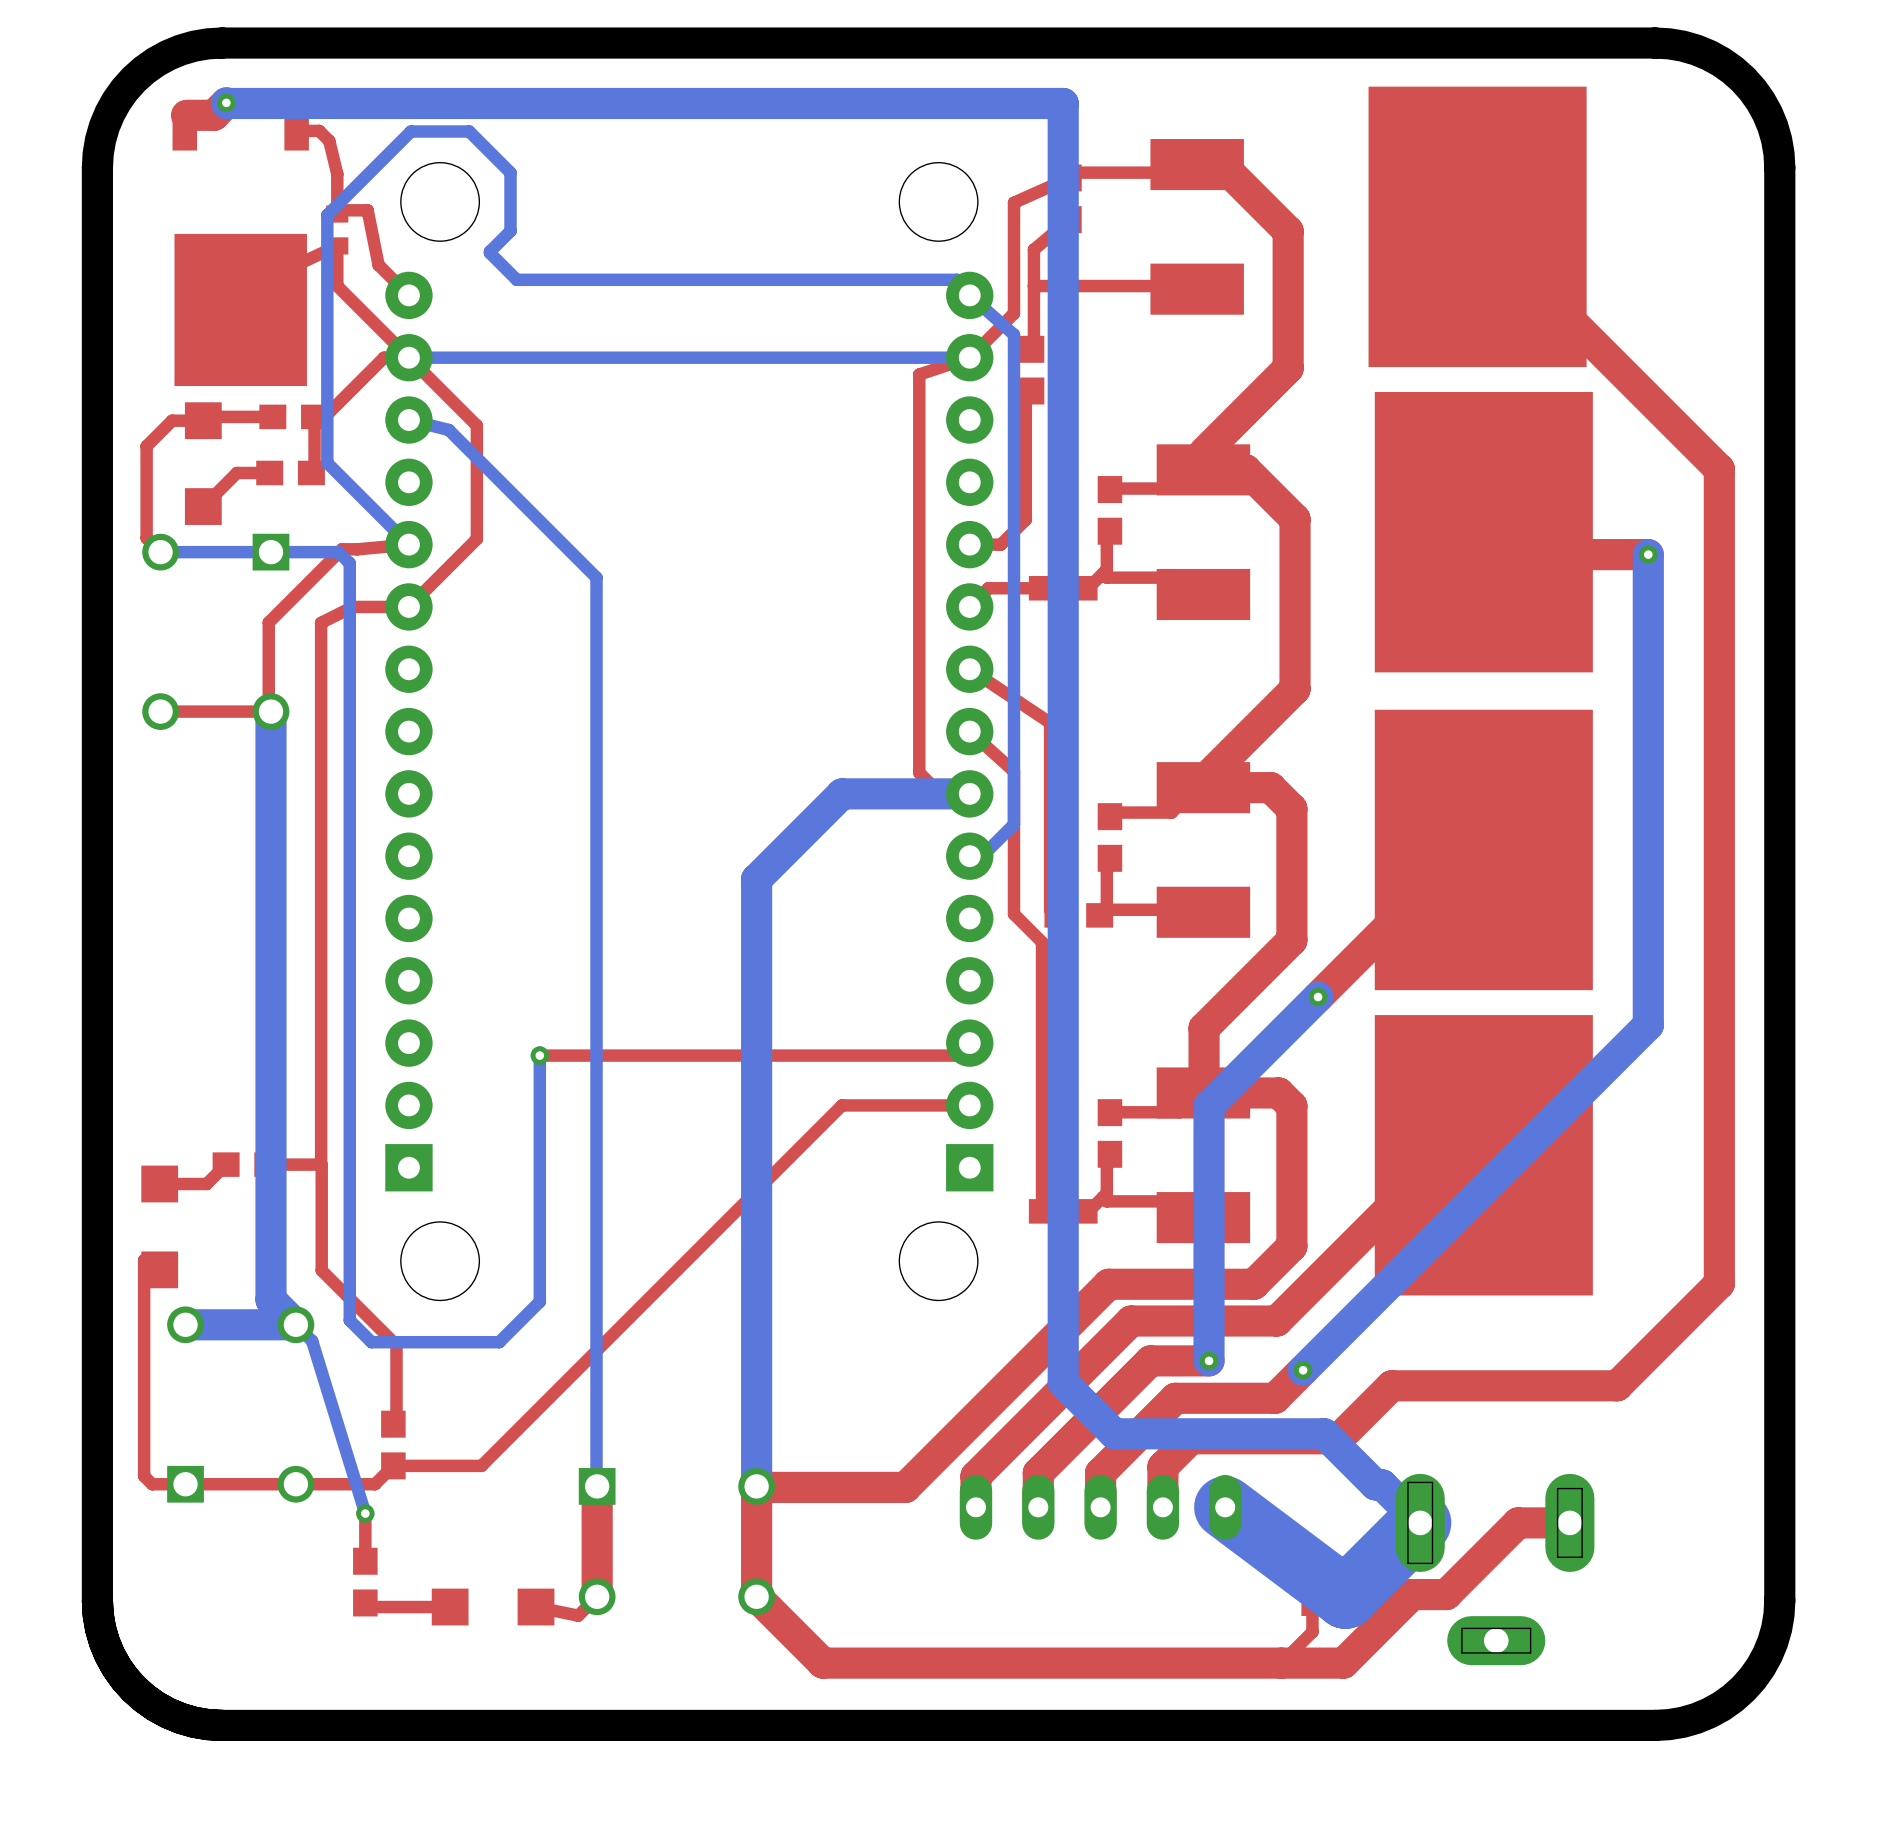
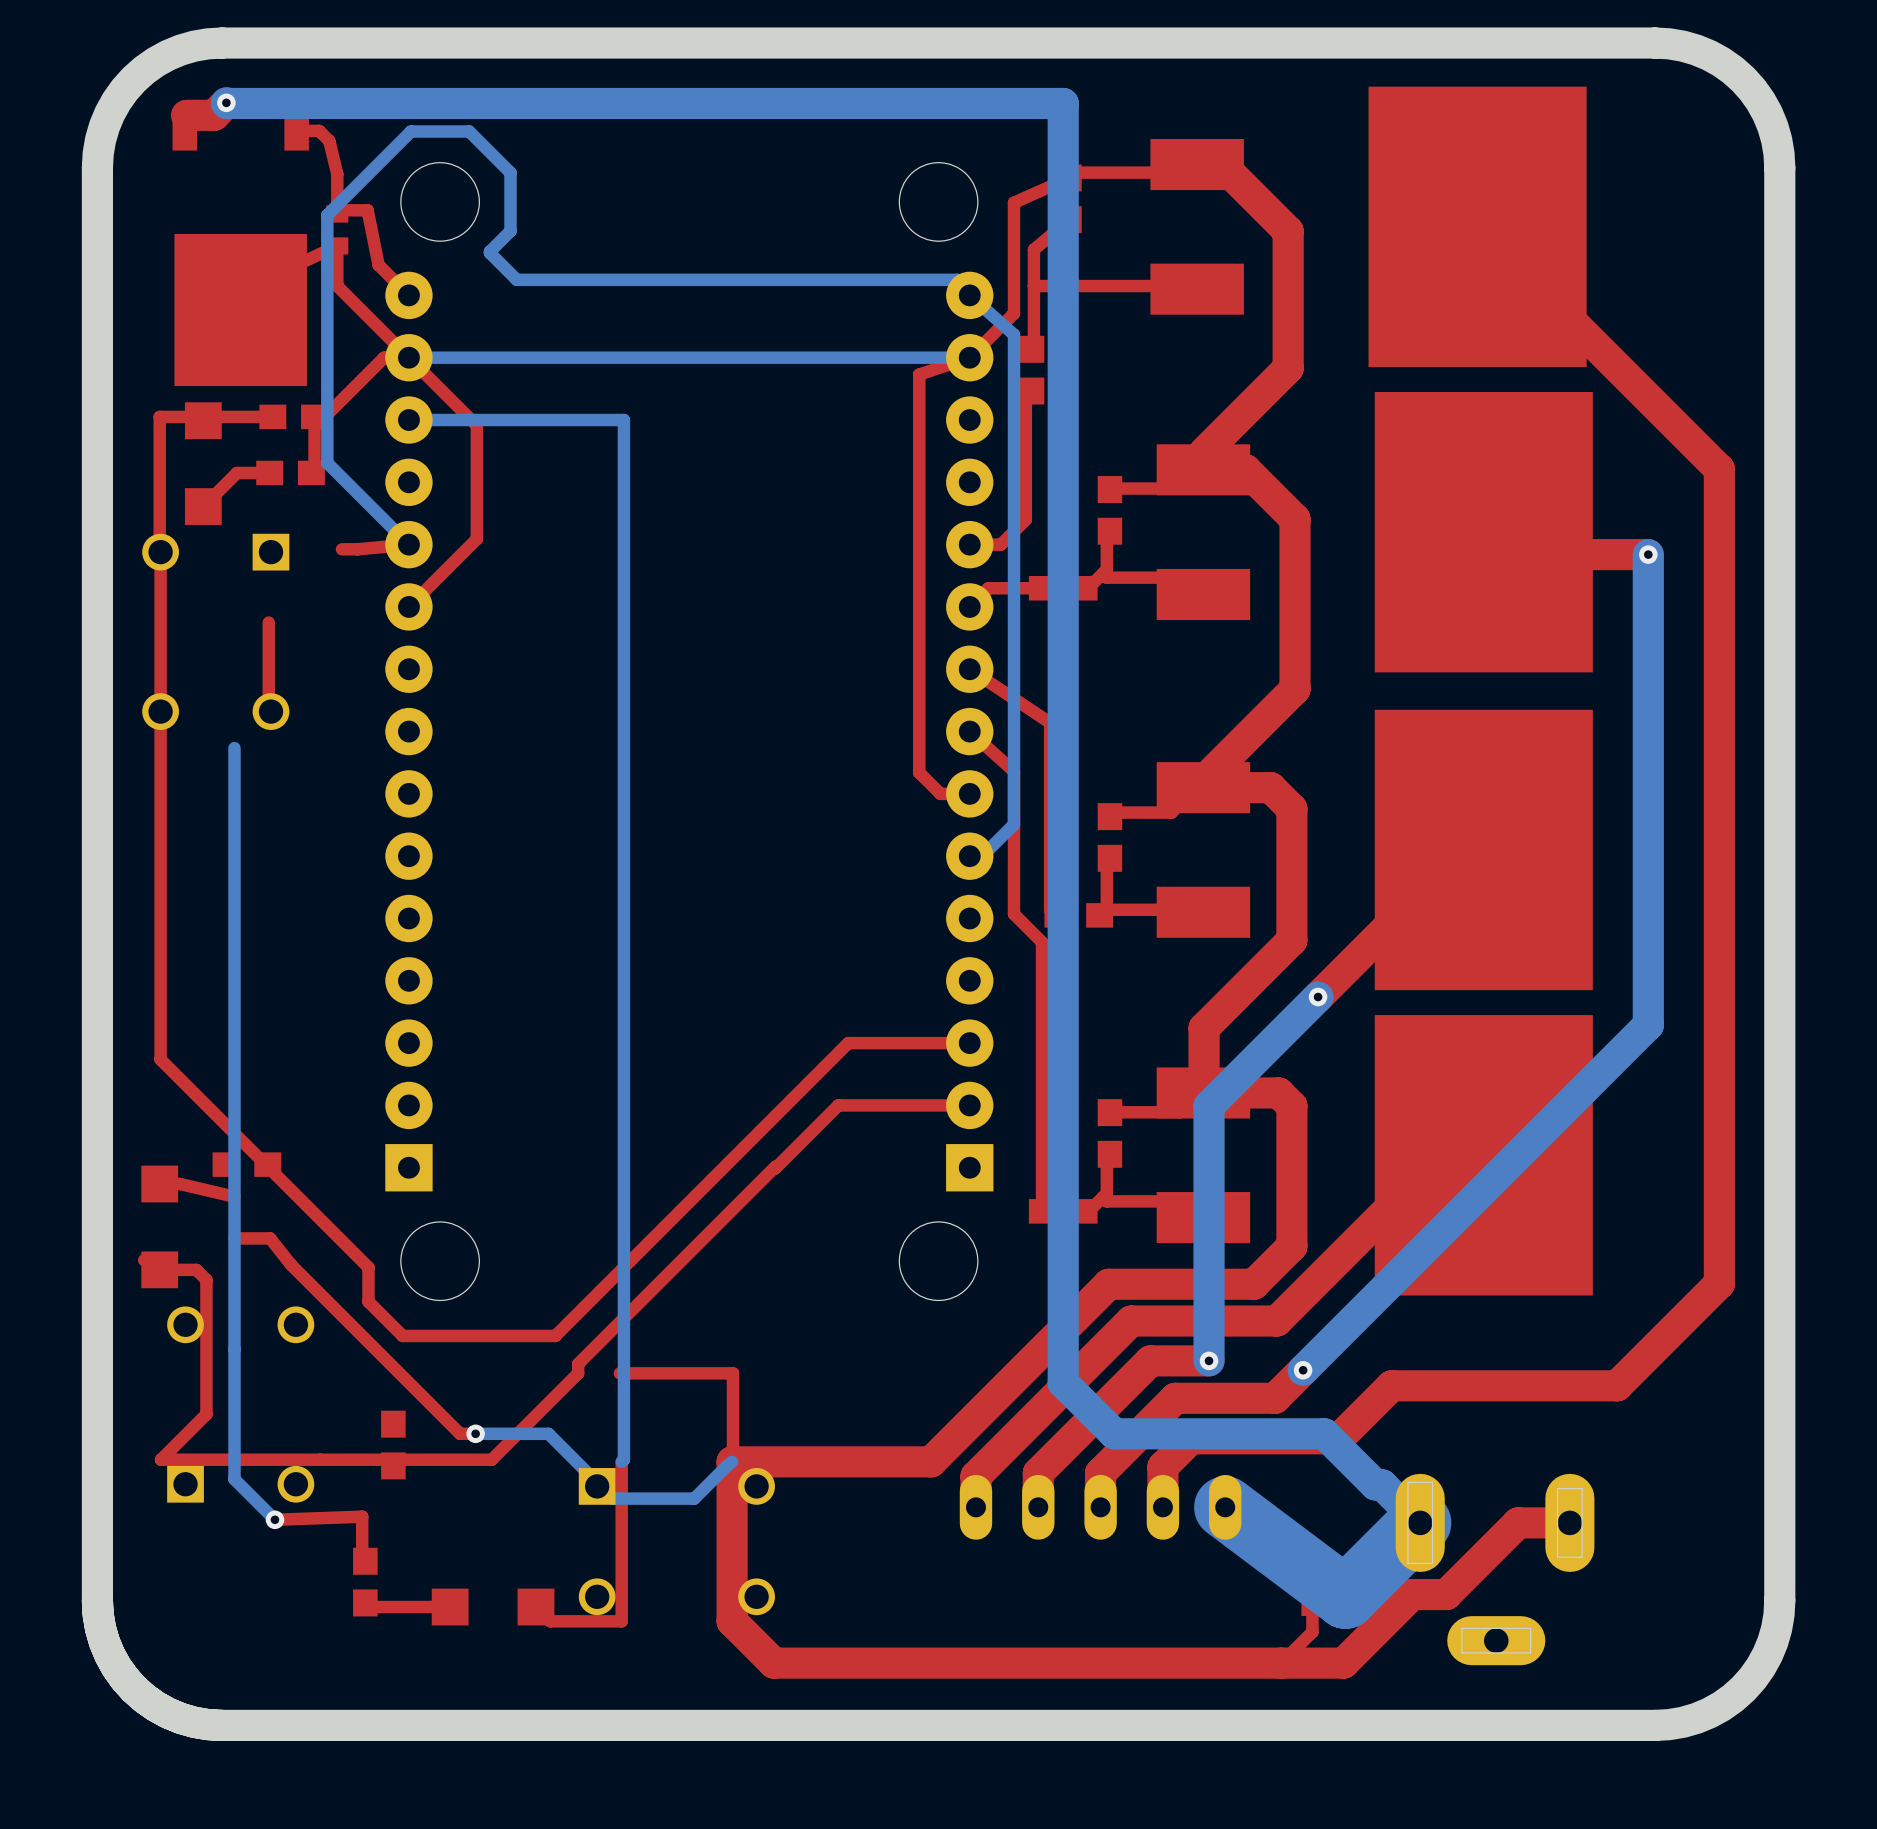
top track: (203, 420) (172, 420) (146, 446) (146, 538) (159, 551) -> (207, 416) (203, 420) (199, 416) (159, 416) (159, 551)
bottom track: (408, 420) (448, 429) (596, 577) (597, 1486) -> (408, 420) (623, 420) (623, 1459) (621, 1461)
top track: (341, 549) (268, 622) -> none
bottom track: (160, 552) (338, 552) (349, 563) (349, 1320) (371, 1342) (499, 1342) (539, 1301) (539, 1052) -> none
top track: (408, 606) (352, 606) (321, 622) (321, 1164) -> none
top track: (268, 709) (270, 711) (160, 711) -> none
bottom track: (270, 711) (270, 1299) (295, 1324) -> none
bottom track: none -> (234, 748) (234, 1479) (274, 1519)
bottom track: (969, 793) (842, 793) (756, 879) (756, 1486) -> none
top track: (969, 1043) (957, 1055) (539, 1055) -> (969, 1043) (848, 1043) (555, 1335) (402, 1335) (368, 1301) (368, 1267) (160, 1059) (160, 552)
via: (539, 1055) -> none
top track: (842, 1105) (481, 1465) (393, 1465) (375, 1484) (152, 1484) (144, 1476) (144, 1260) -> (842, 1105) (838, 1105) (775, 1168) (775, 1166) (578, 1364) (578, 1373) (491, 1459) (160, 1459) (206, 1414) (206, 1279) (196, 1269) (159, 1269)
top track: (226, 1164) (206, 1184) (180, 1184) -> (234, 1196) (180, 1184)
top track: (321, 1164) (267, 1164) -> none
top track: (321, 1164) (321, 1270) (396, 1345) (396, 1421) (393, 1424) -> none
top track: none -> (234, 1238) (270, 1238) (291, 1264) (460, 1433) (475, 1433)
bottom track: (295, 1324) (312, 1341) (365, 1513) -> none
bottom track: (295, 1324) (185, 1324) -> none
top track: none -> (619, 1373) (732, 1373) (732, 1461)
bottom track: none -> (475, 1433) (548, 1433) (613, 1498) (694, 1498) (732, 1461)
via: none -> (475, 1433)
top track: (931, 1461) (905, 1487) (756, 1486) -> (931, 1461) (732, 1461)
top track: (597, 1486) (597, 1596) (578, 1615) (536, 1607) -> (621, 1461) (621, 1621) (550, 1621) (536, 1607)
top track: (756, 1486) (755, 1594) (822, 1663) -> (732, 1461) (732, 1621) (773, 1663) (822, 1663)
top track: (365, 1513) (365, 1561) -> (274, 1519) (362, 1516) (362, 1558) (365, 1561)
via: (365, 1513) -> none
via: none -> (274, 1519)

